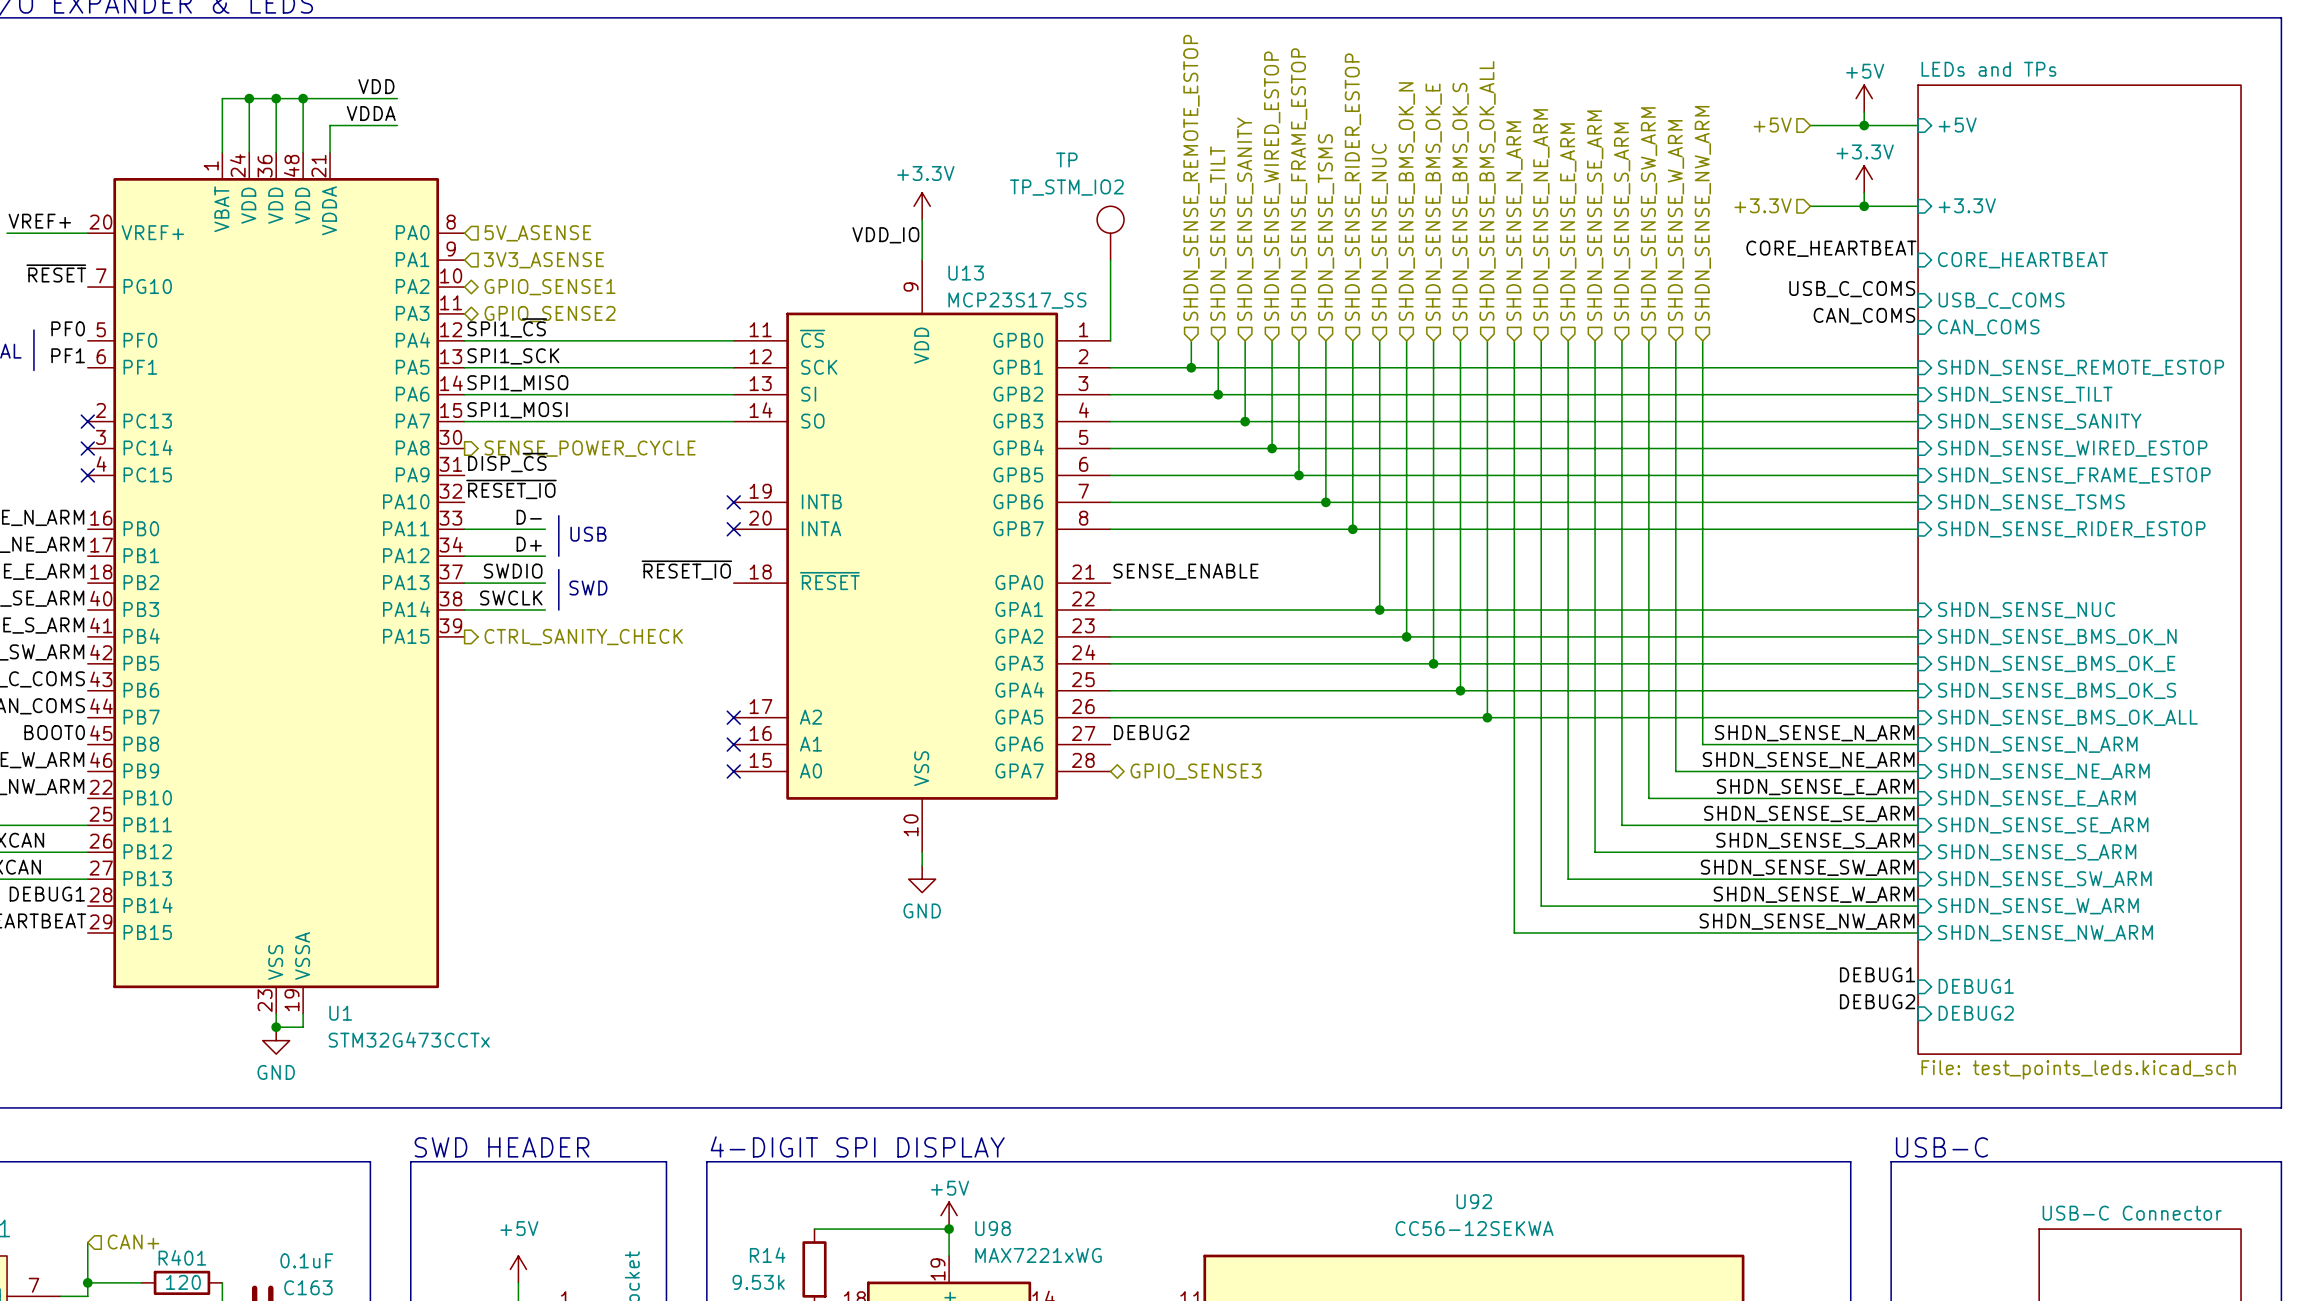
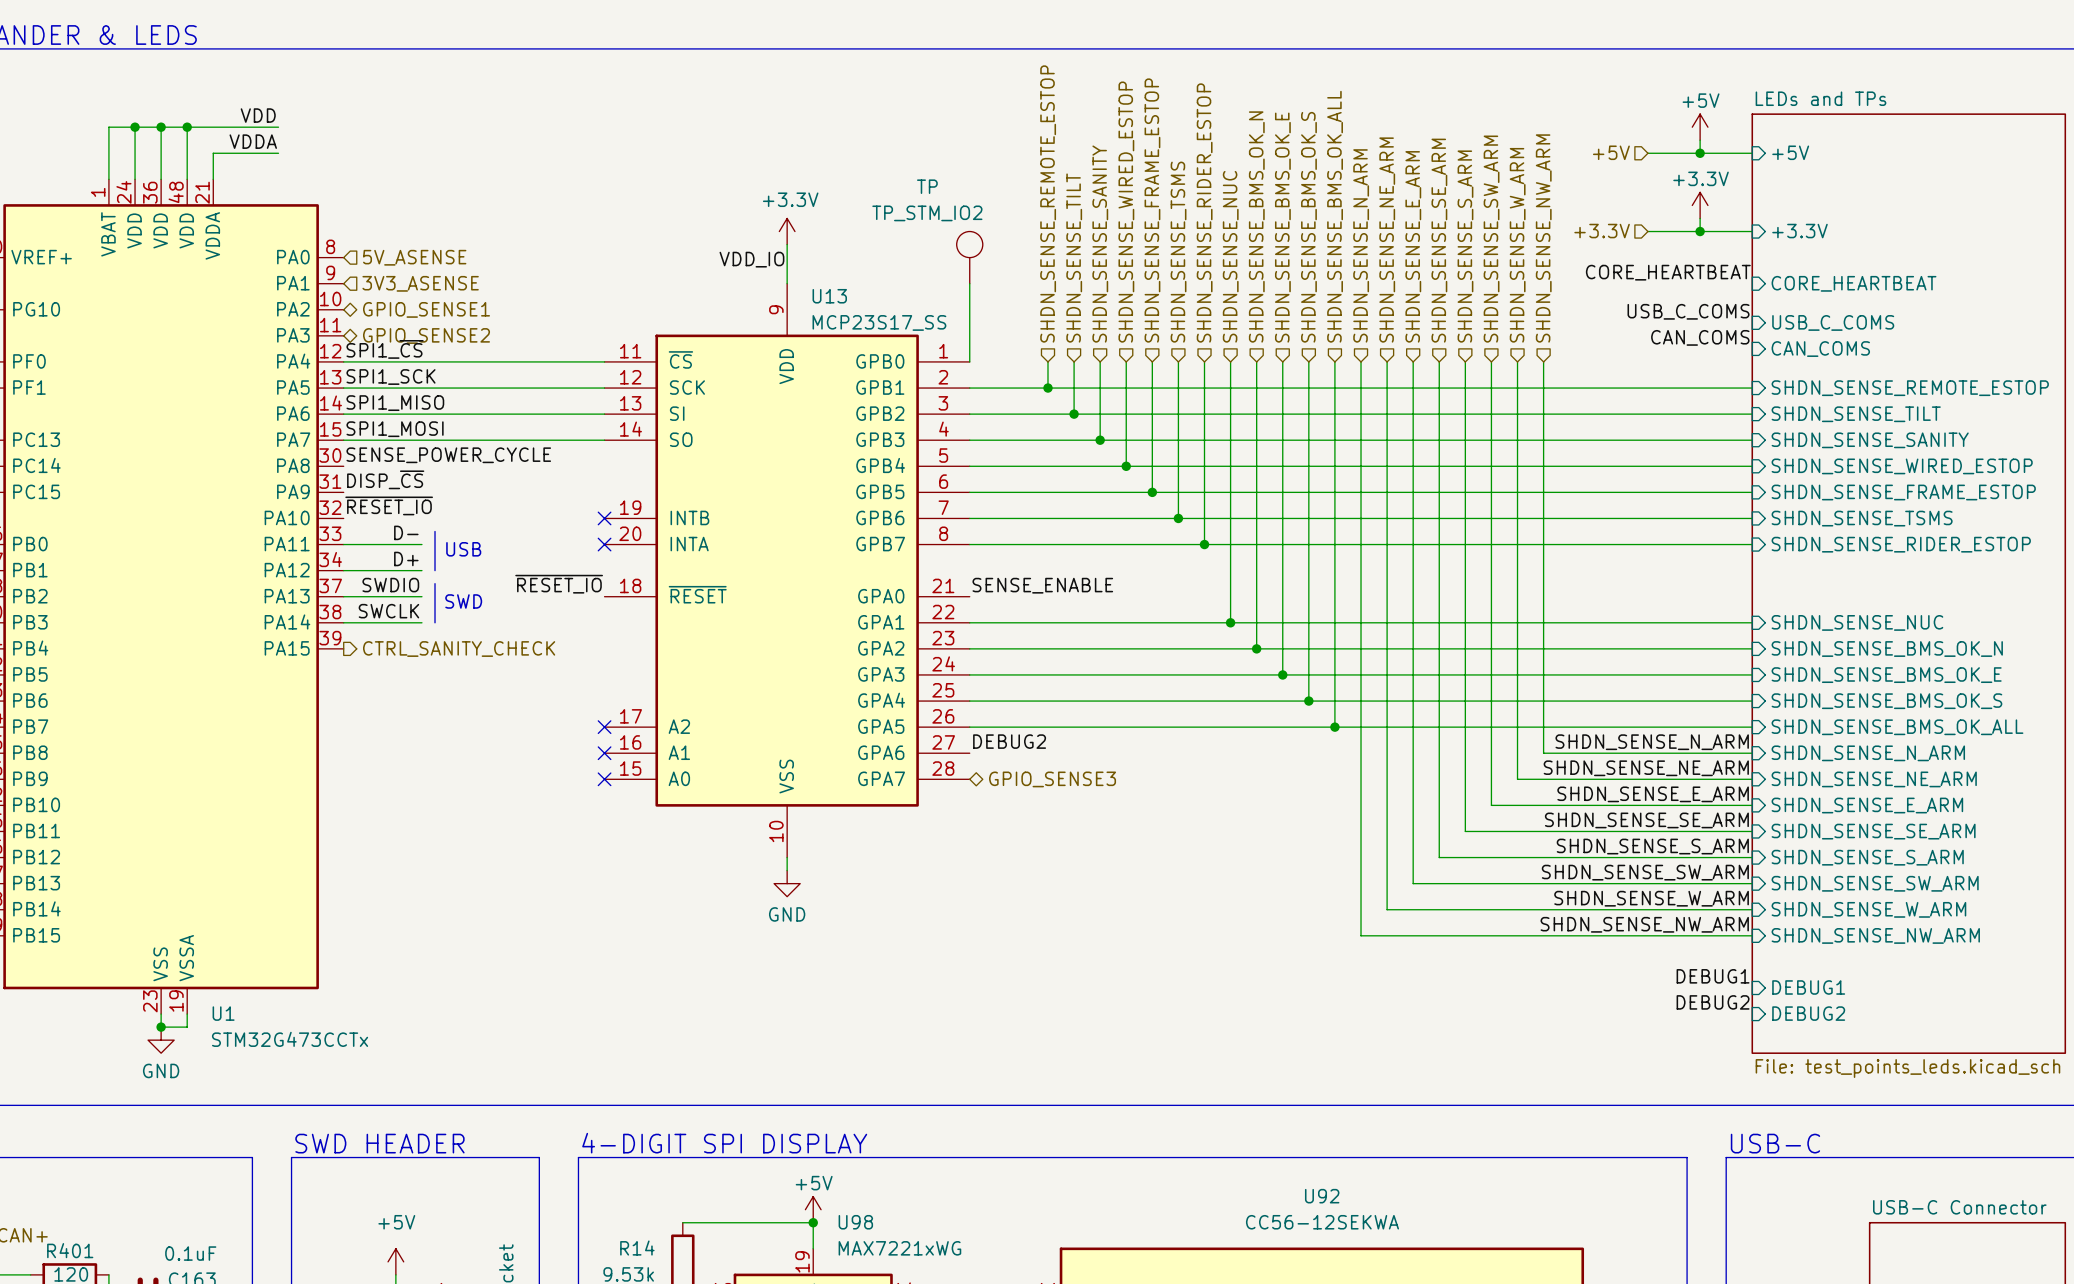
label: none -> SENSE_POWER_CYCLE (448, 455)
hierarchical label: SENSE_POWER_CYCLE (590, 448) -> none

